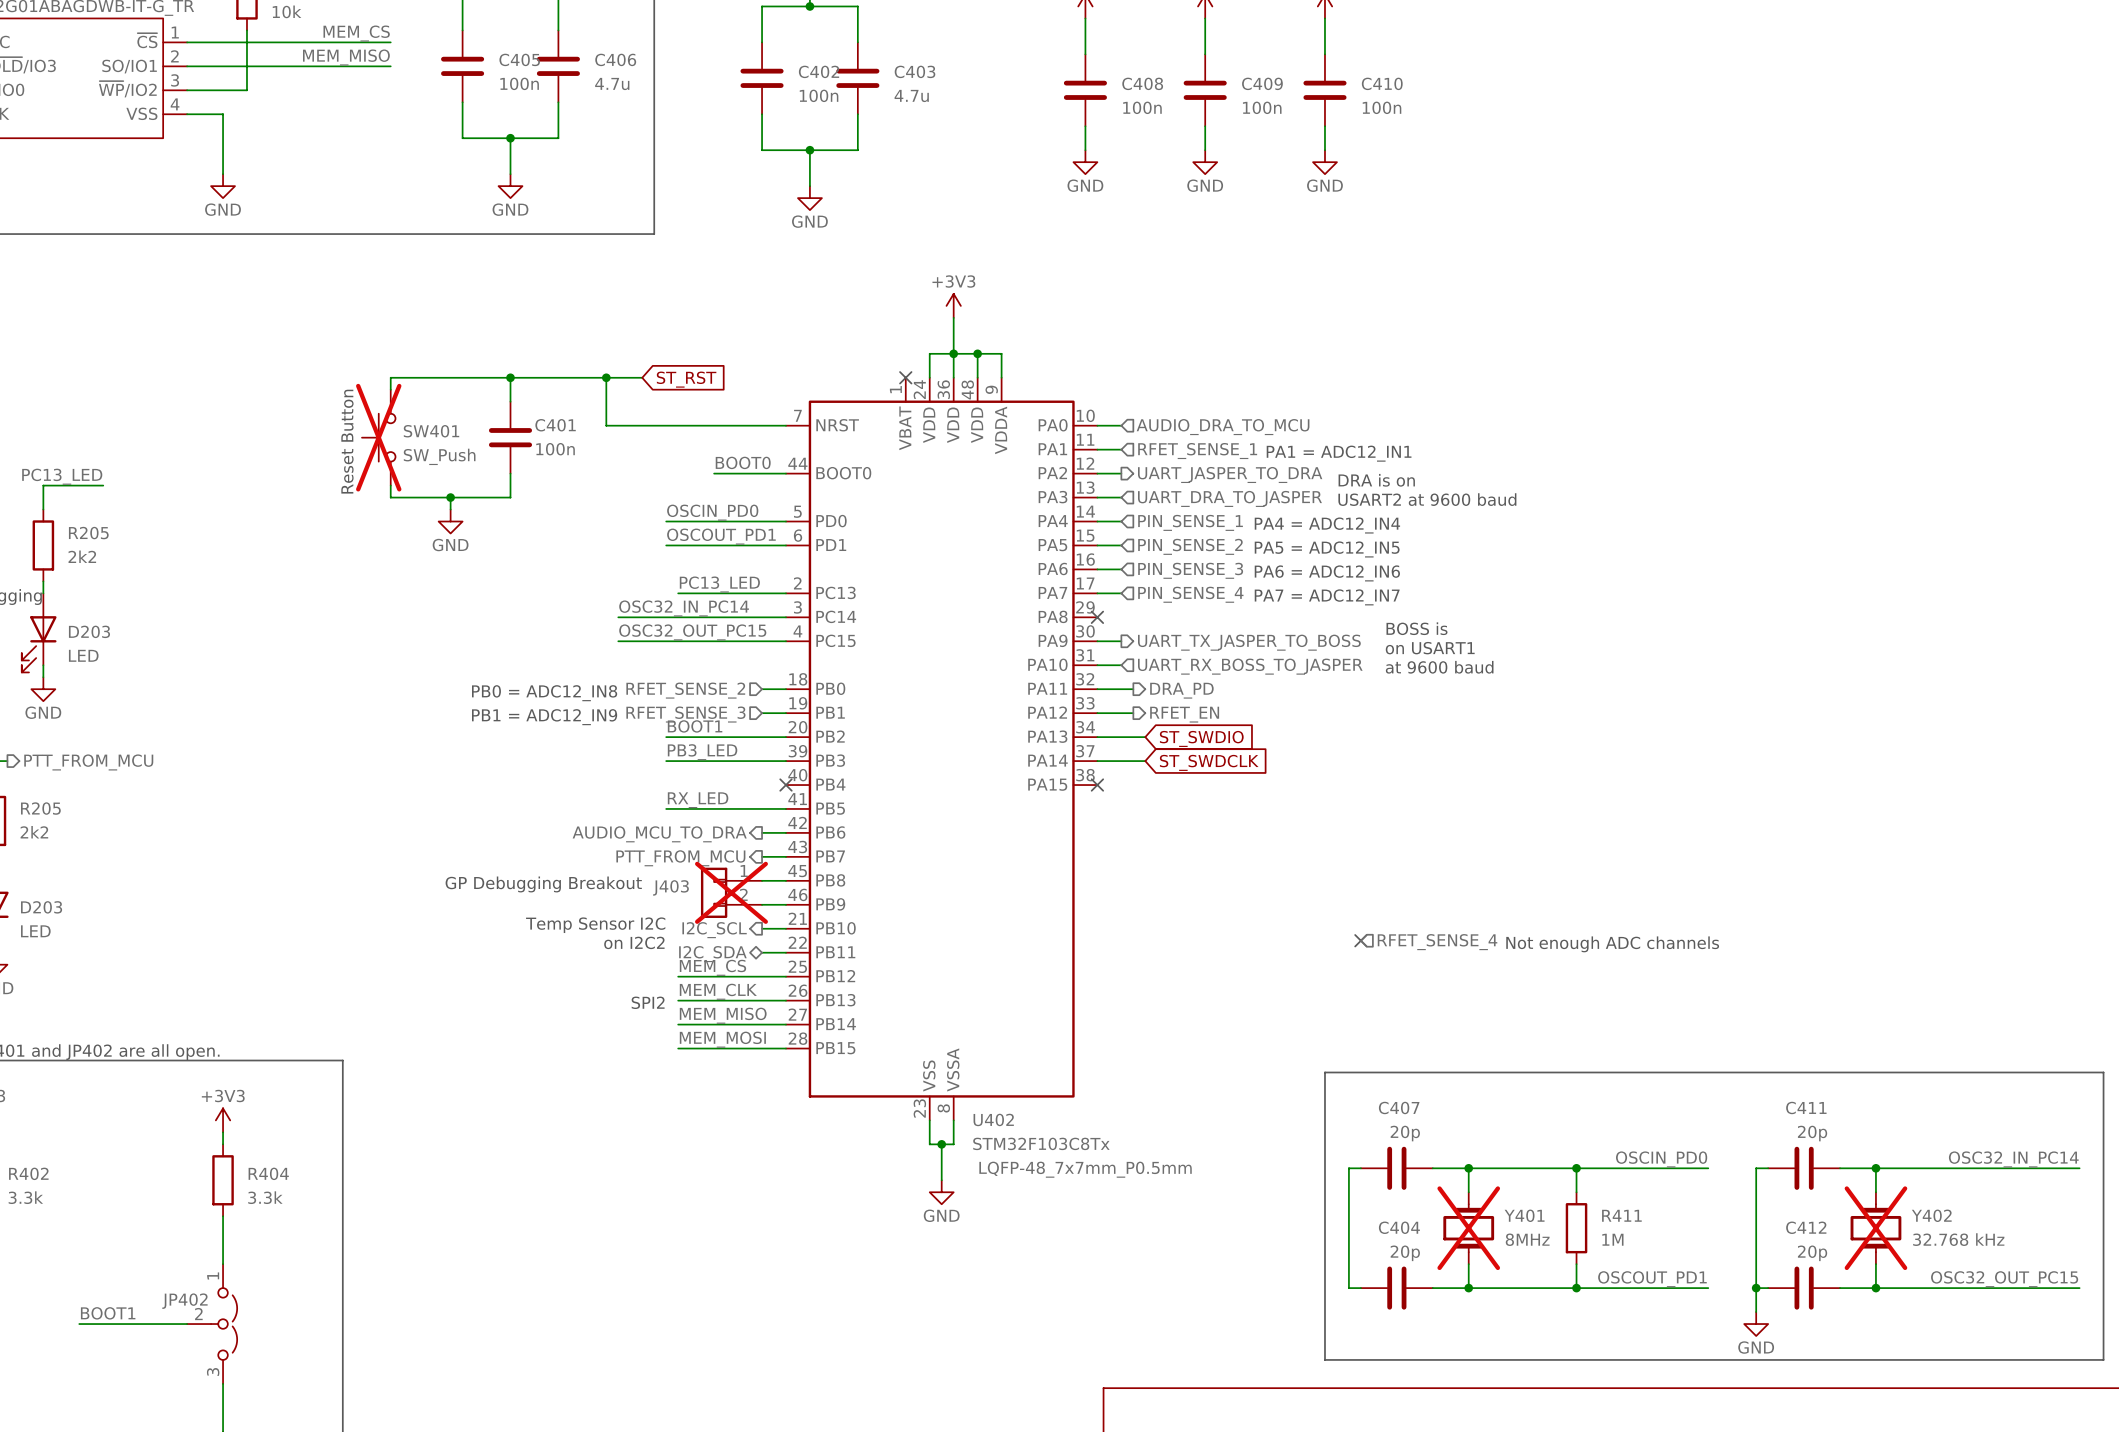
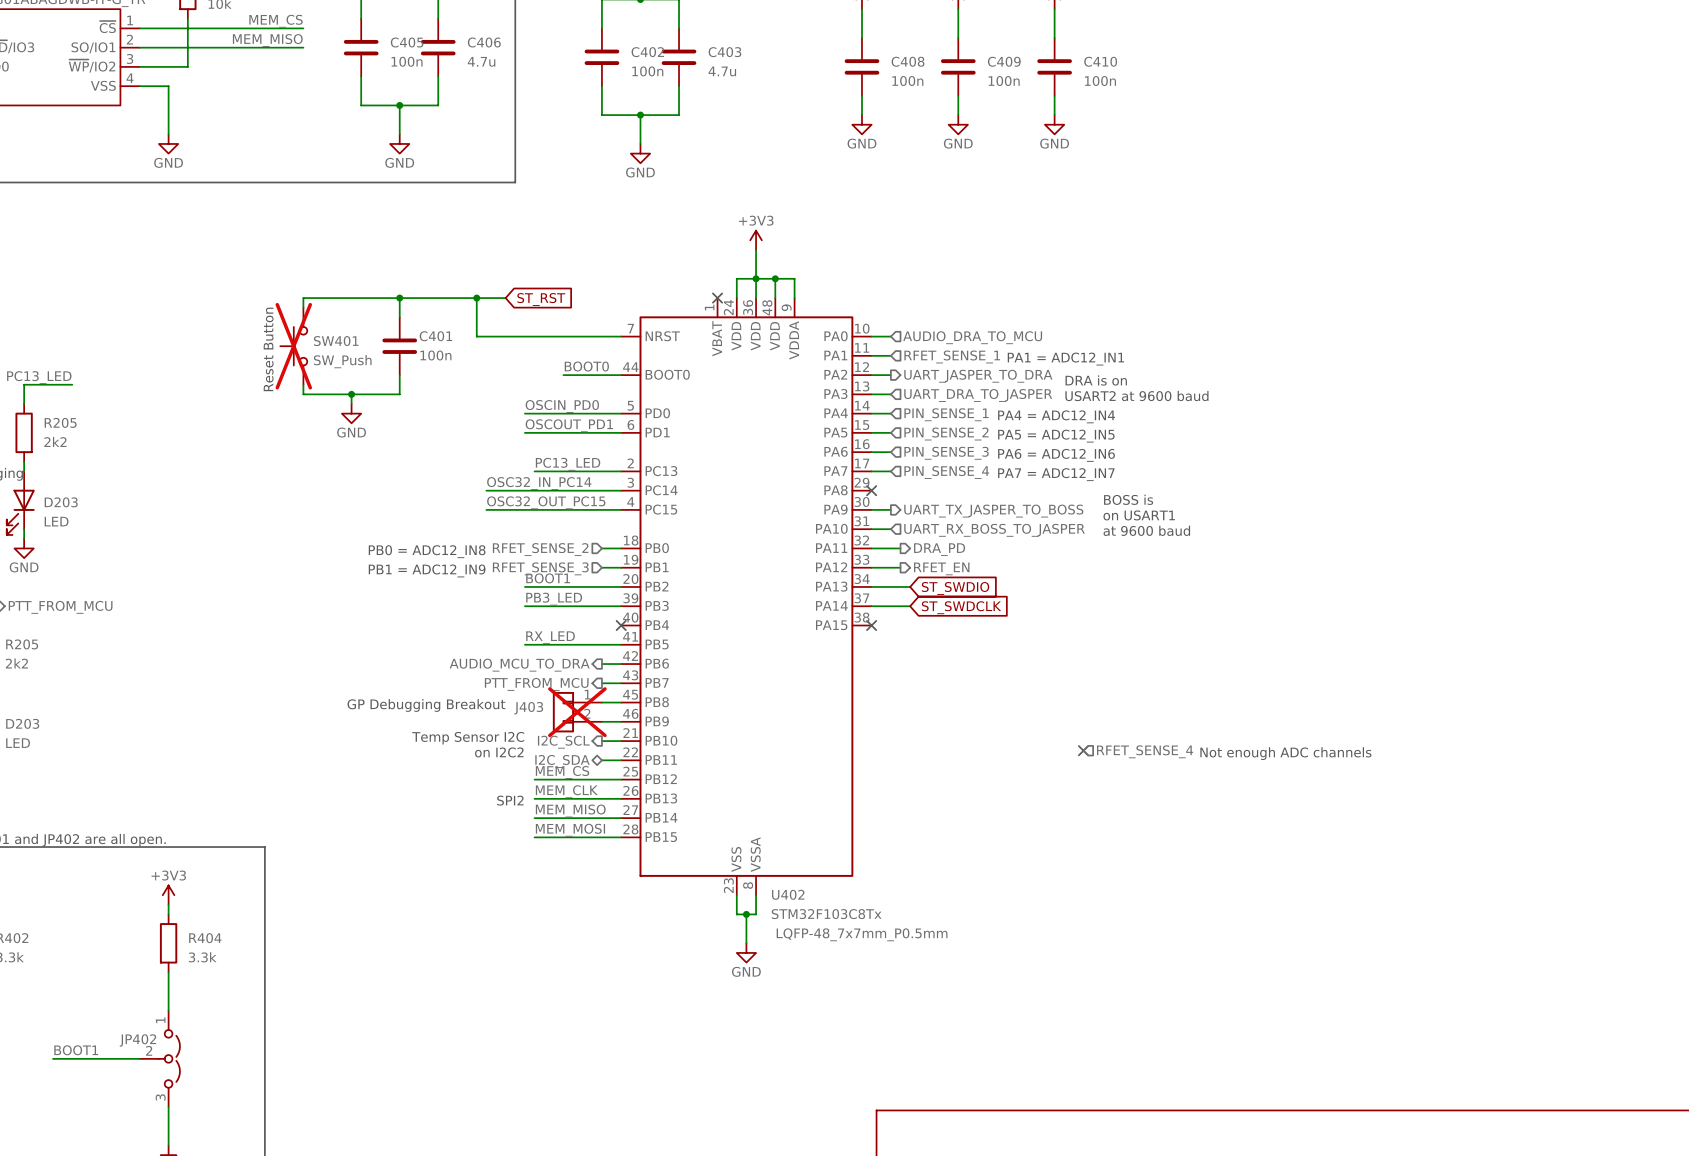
line: (1324, 1072) (2103, 1072) (2103, 1359) (1324, 1359) (1324, 1072) -> none
label: OSCIN_PD0 (1661, 1159) -> none
label: OSC32_IN_PC14 (2013, 1159) -> none
wire: (1360, 1168) (1348, 1168) (1348, 1288) (1360, 1288) -> none
C407: 20p (1396, 1168) -> none
wire: (1432, 1168) (1708, 1168) -> none
wire: (1468, 1168) (1468, 1192) -> none
junction: (1468, 1168) -> none
wire: (1576, 1168) (1576, 1192) -> none
junction: (1576, 1168) -> none
wire: (1768, 1168) (1756, 1168) (1756, 1312) -> none
C411: 20p (1804, 1168) -> none
wire: (1840, 1168) (2079, 1168) -> none
wire: (1875, 1168) (1875, 1192) -> none
junction: (1875, 1168) -> none
Y401: 8MHz (1468, 1228) -> none
R411: 1M (1576, 1228) -> none
Y402: 32.768 kHz (1875, 1228) -> none
wire: (1468, 1264) (1468, 1288) -> none
wire: (1576, 1264) (1576, 1288) -> none
wire: (1875, 1264) (1875, 1288) -> none
label: OSCOUT_PD1 (1652, 1279) -> none
label: OSC32_OUT_PC15 (2004, 1279) -> none
C404: 20p (1396, 1288) -> none
wire: (1432, 1288) (1708, 1288) -> none
junction: (1468, 1288) -> none
junction: (1576, 1288) -> none
wire: (1756, 1288) (1768, 1288) -> none
junction: (1756, 1288) -> none
C412: 20p (1804, 1288) -> none
wire: (1840, 1288) (2079, 1288) -> none
junction: (1875, 1288) -> none
power symbol: GND (1756, 1324) -> none

